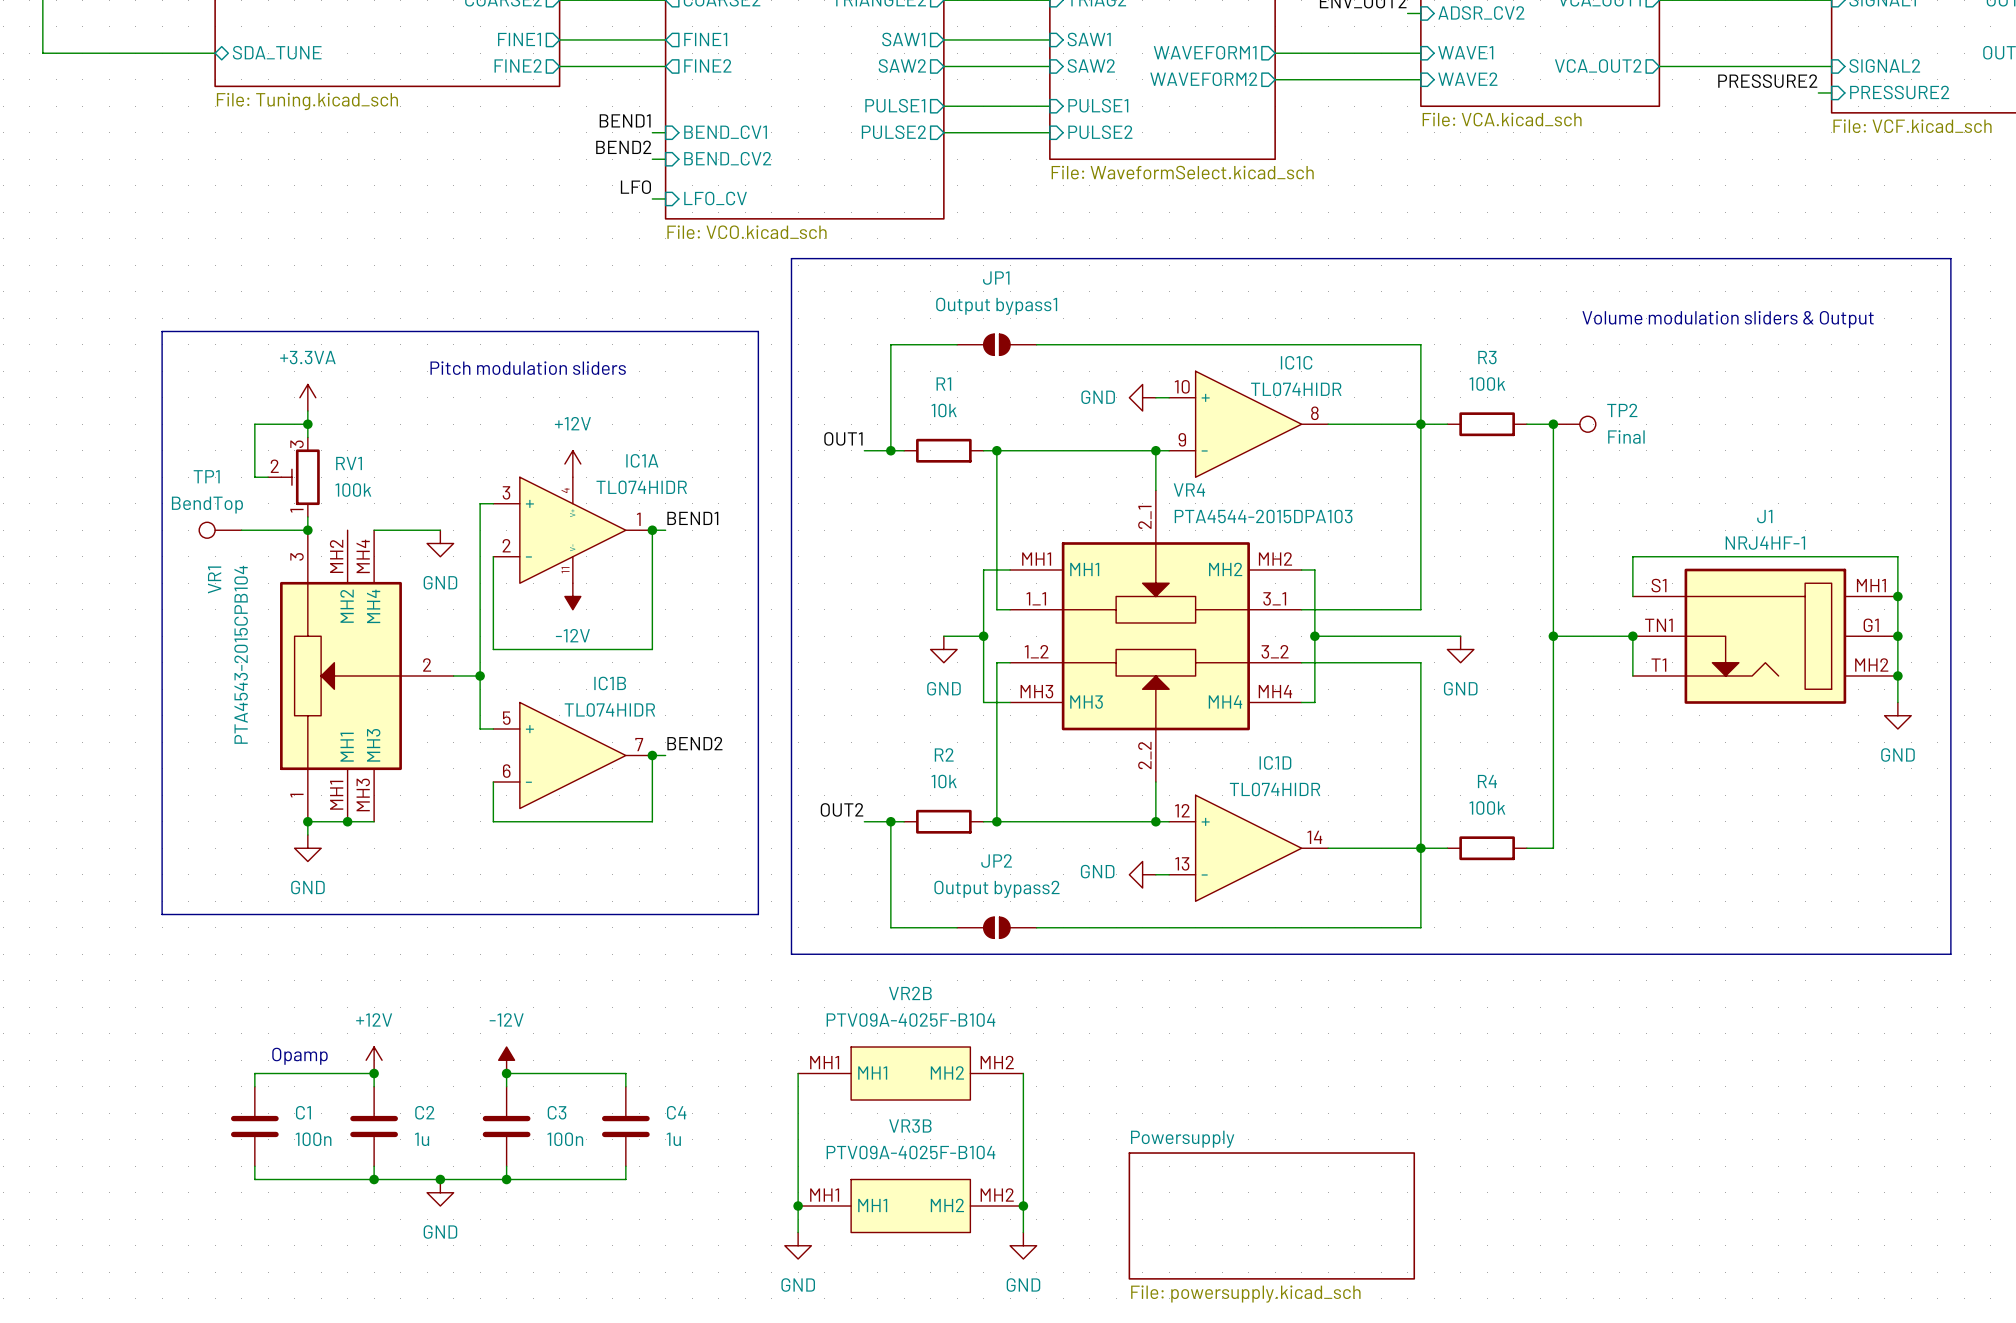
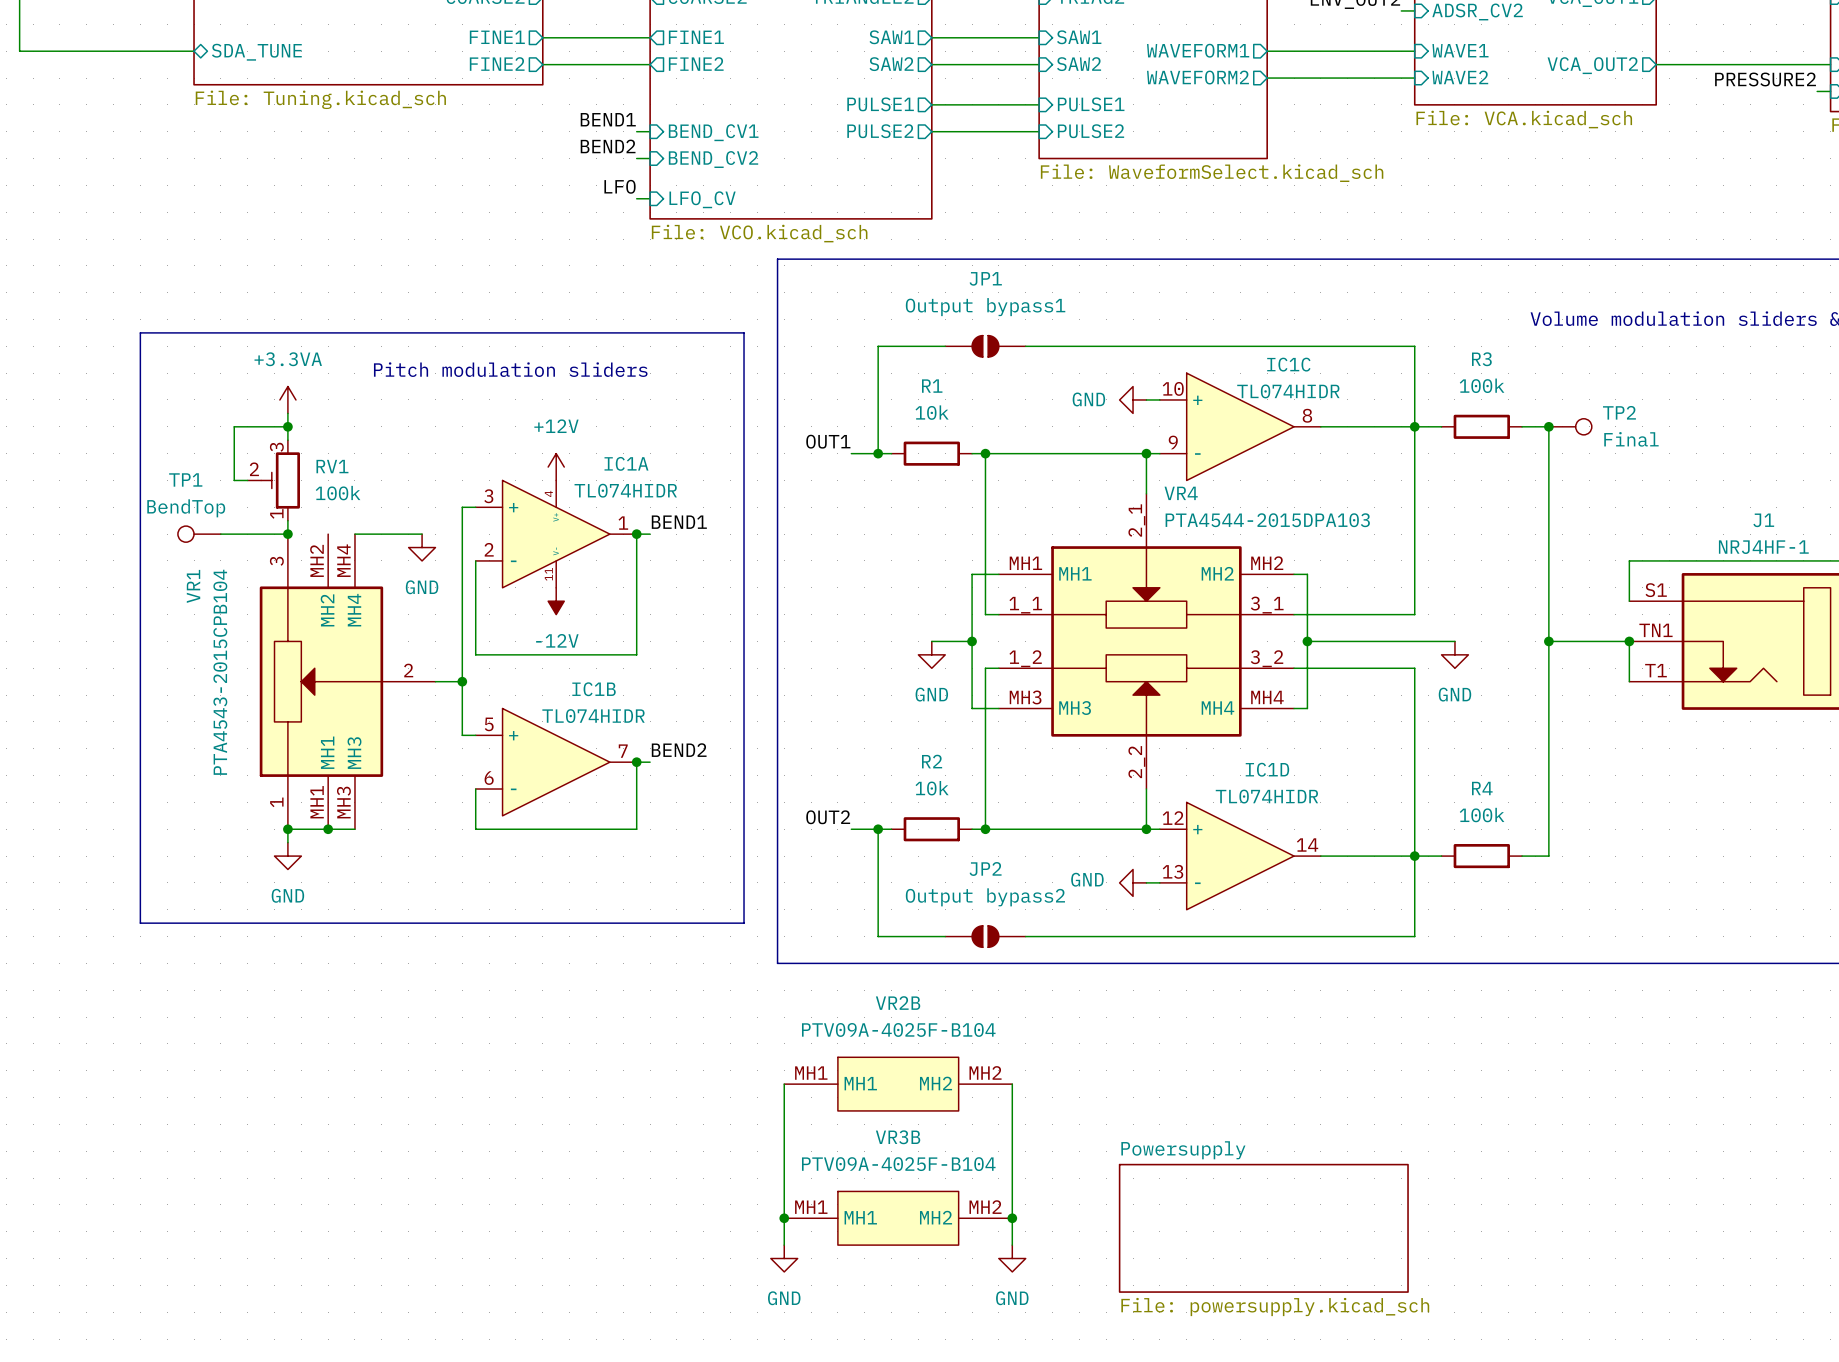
text: Opamp (299, 1056) -> none
power symbol: +12V (374, 1060) -> none
power symbol: -12V (506, 1060) -> none
junction: (374, 1073) -> none
junction: (506, 1073) -> none
wire: (254, 1086) (254, 1073) (374, 1073) (374, 1086) -> none
wire: (506, 1086) (506, 1073) (625, 1073) (625, 1086) -> none
C1: 100n (254, 1126) -> none
C2: 1u (374, 1126) -> none
C3: 100n (506, 1126) -> none
C4: 1u (625, 1126) -> none
wire: (254, 1166) (254, 1179) (625, 1179) (625, 1166) -> none
wire: (374, 1166) (374, 1179) -> none
wire: (506, 1166) (506, 1179) -> none
junction: (374, 1179) -> none
junction: (440, 1179) -> none
junction: (506, 1179) -> none
power symbol: GND (440, 1192) -> none

